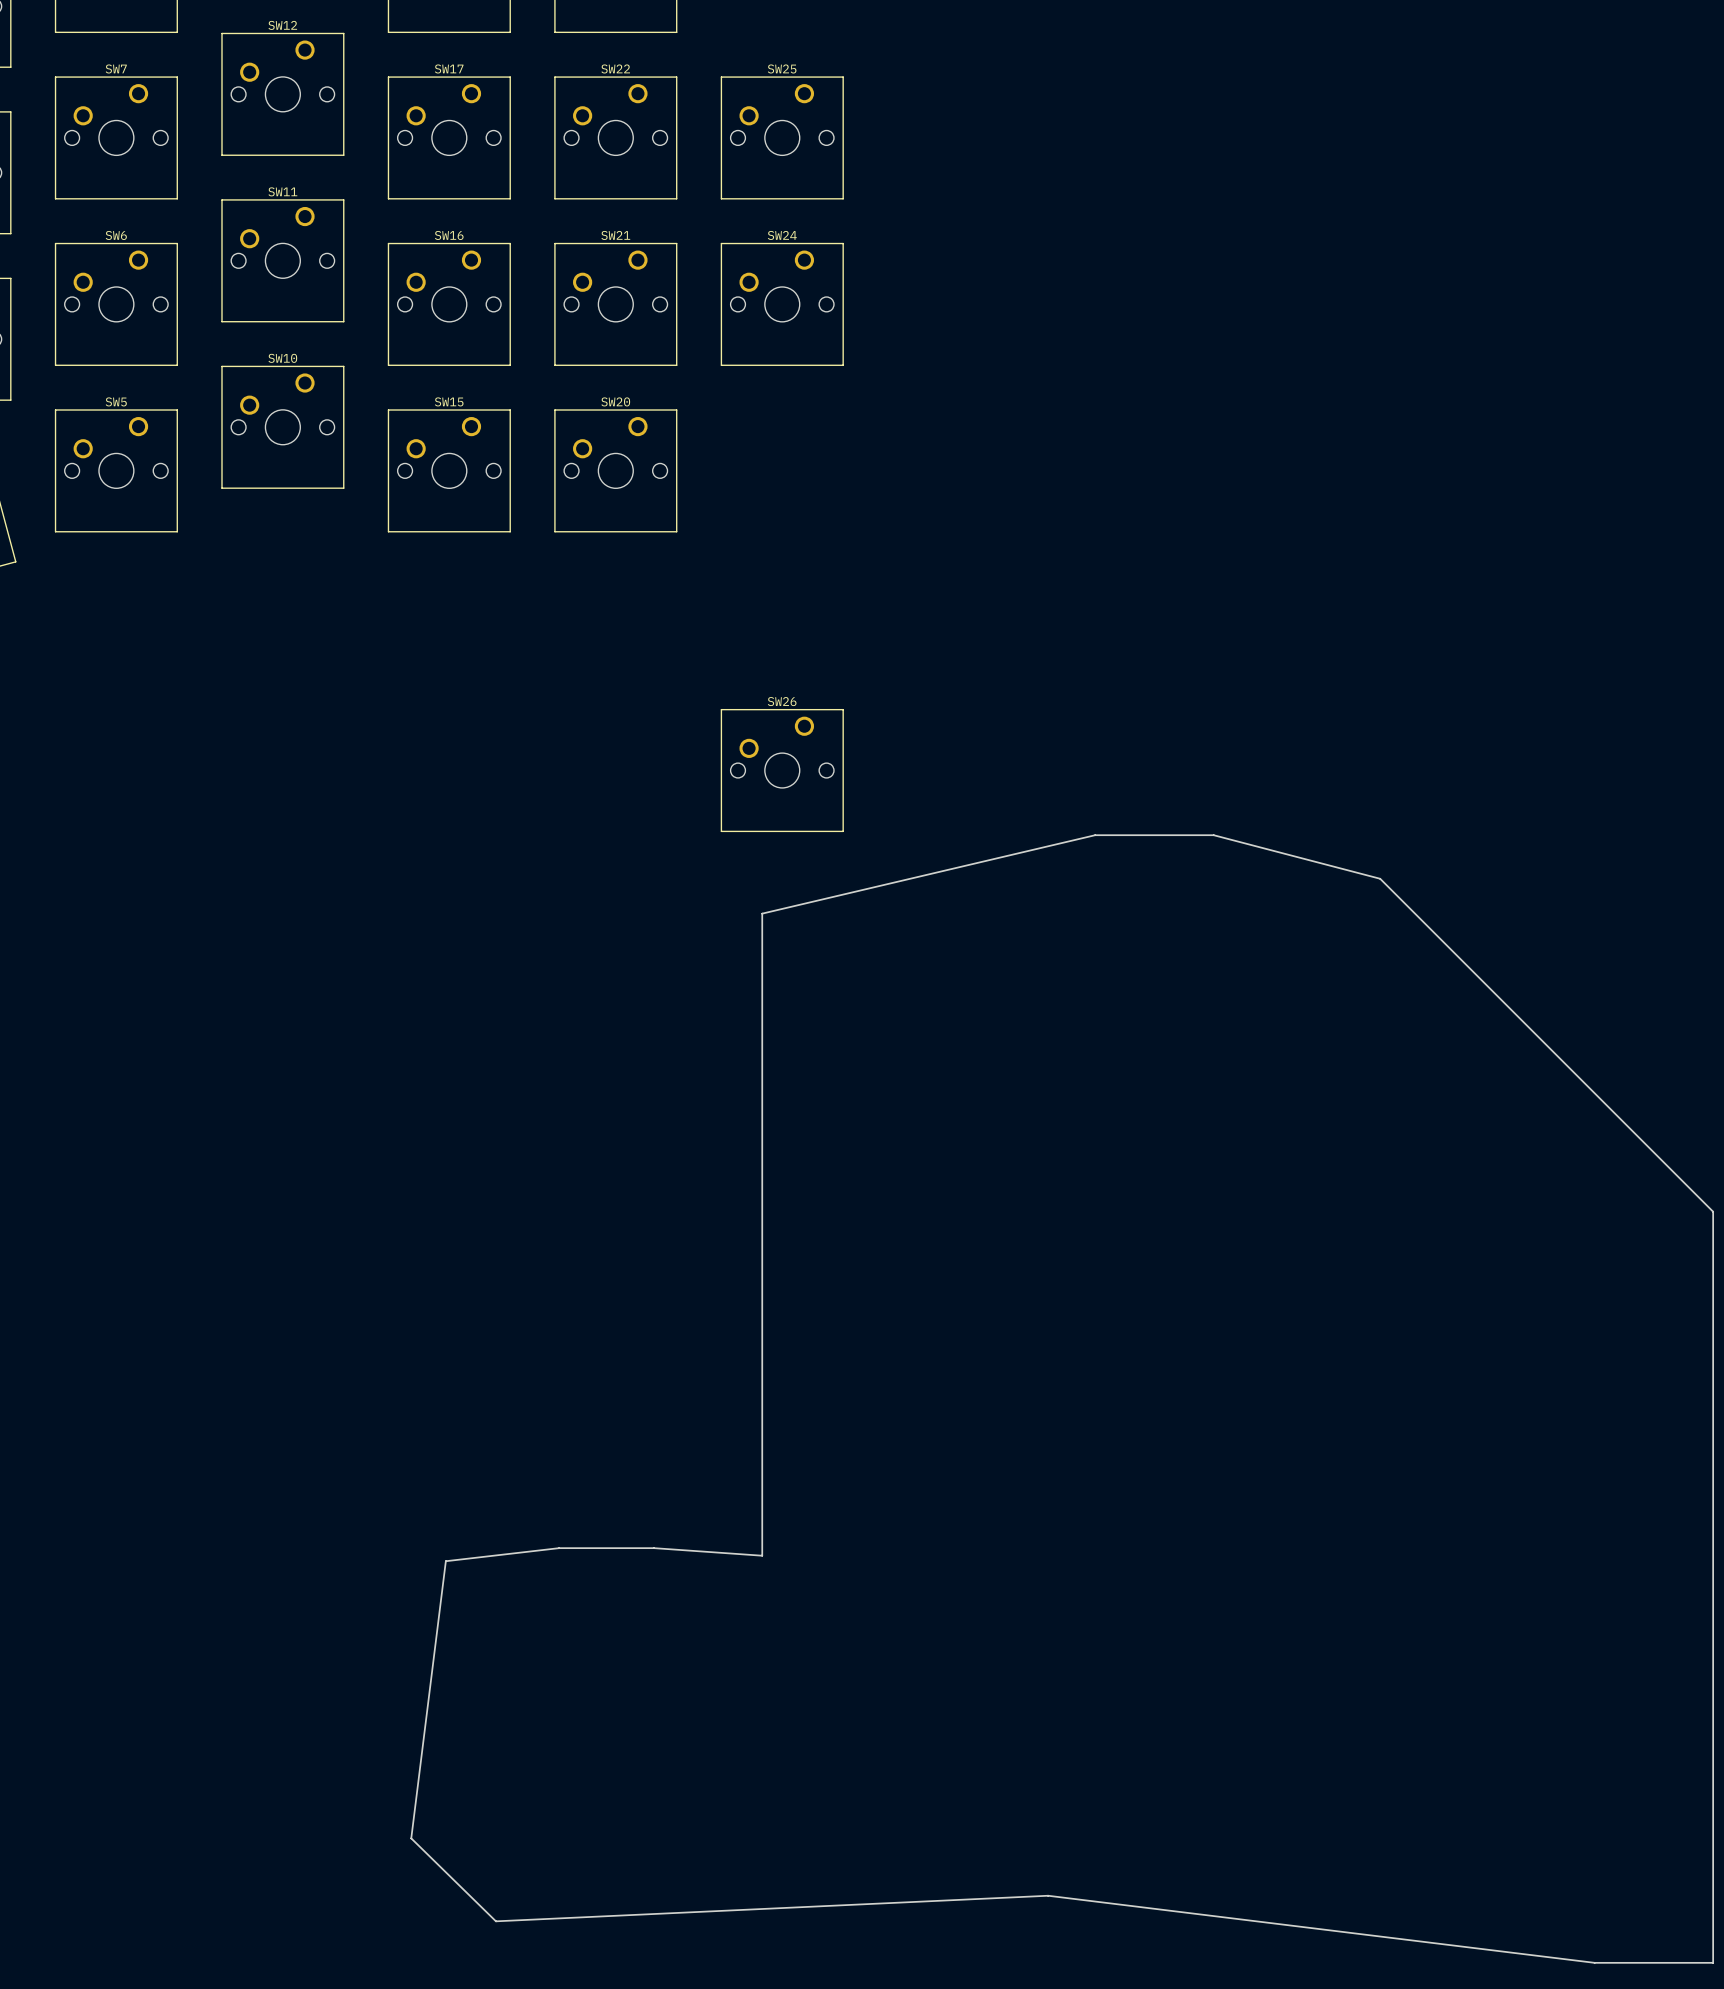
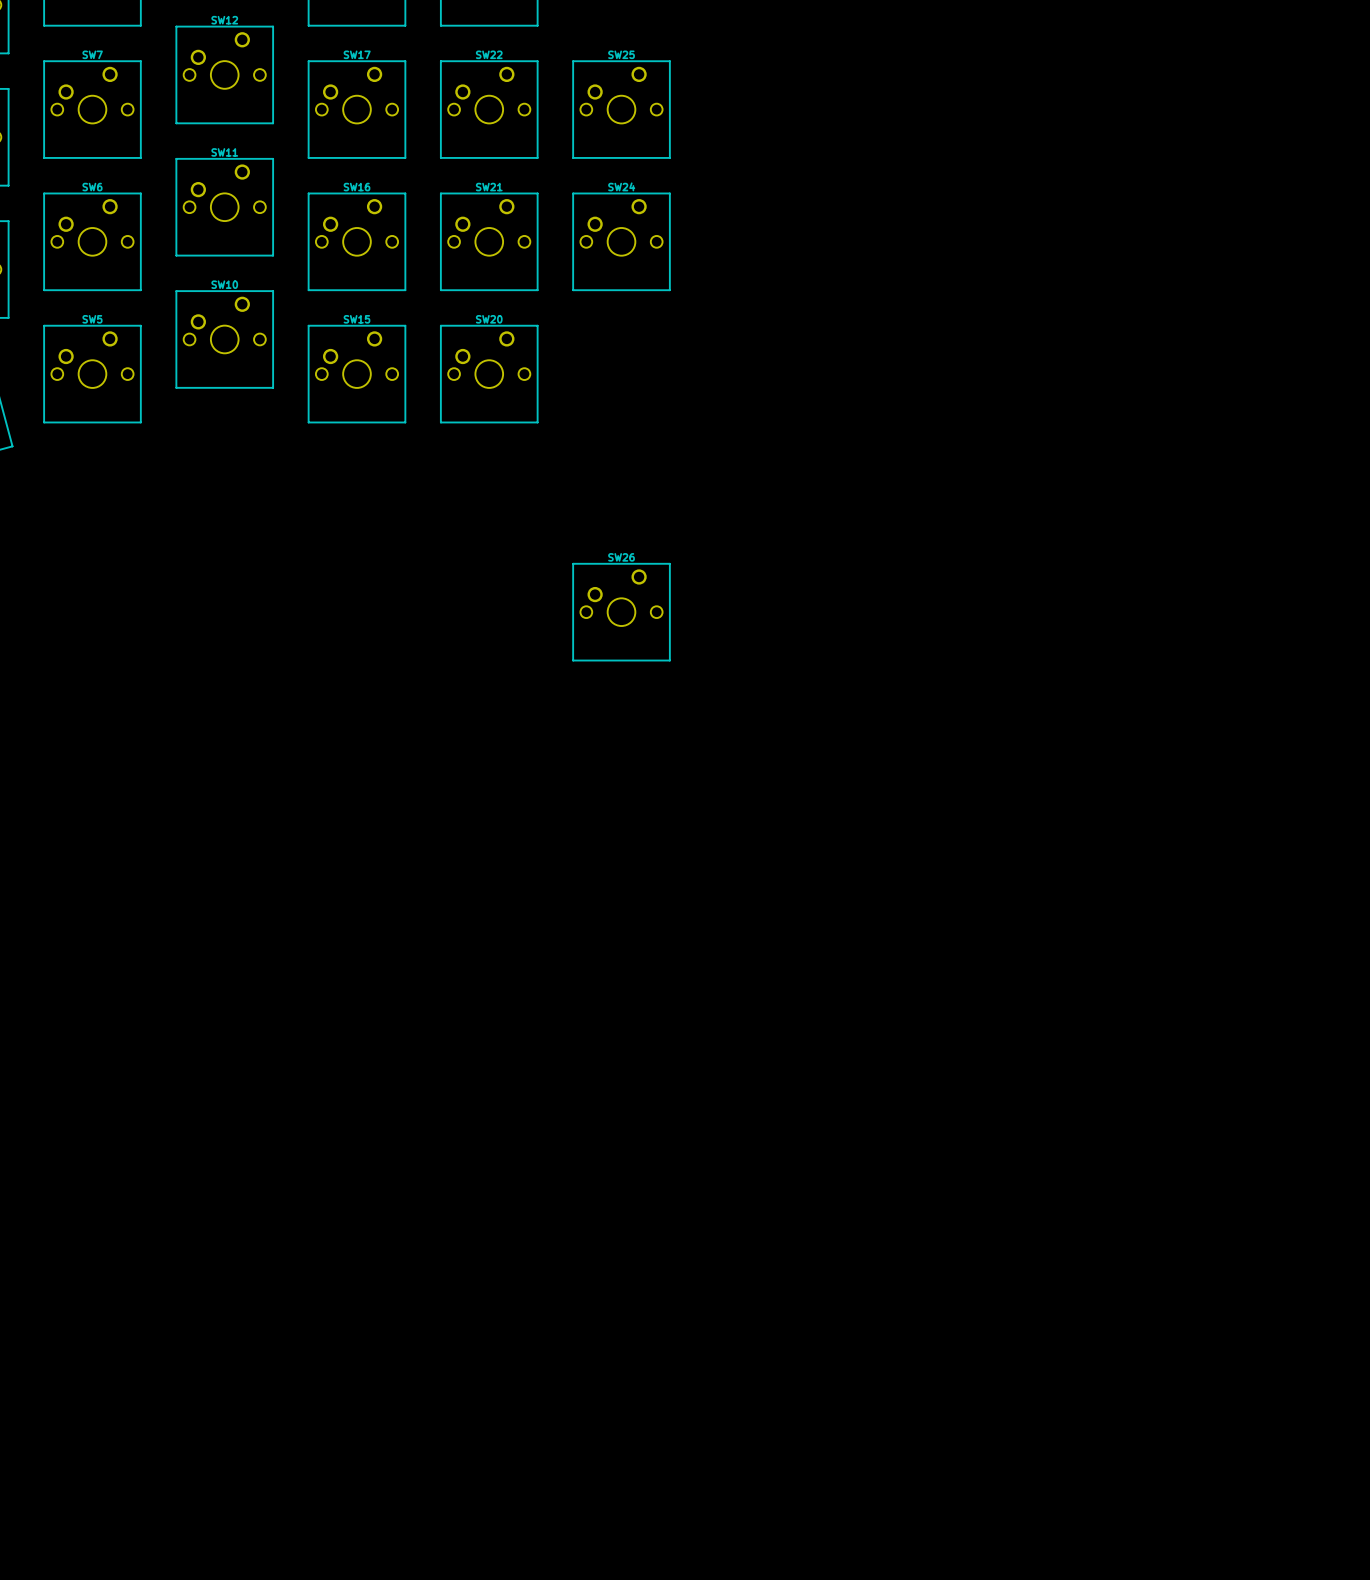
board edge: (1095, 835) (762, 913) (762, 1555) (654, 1548) (559, 1548) (445, 1561) (411, 1838) (495, 1921) (1048, 1895) (1594, 1962) (1713, 1962) (1713, 1211) (1380, 878) (1213, 835) (1095, 835) -> none

